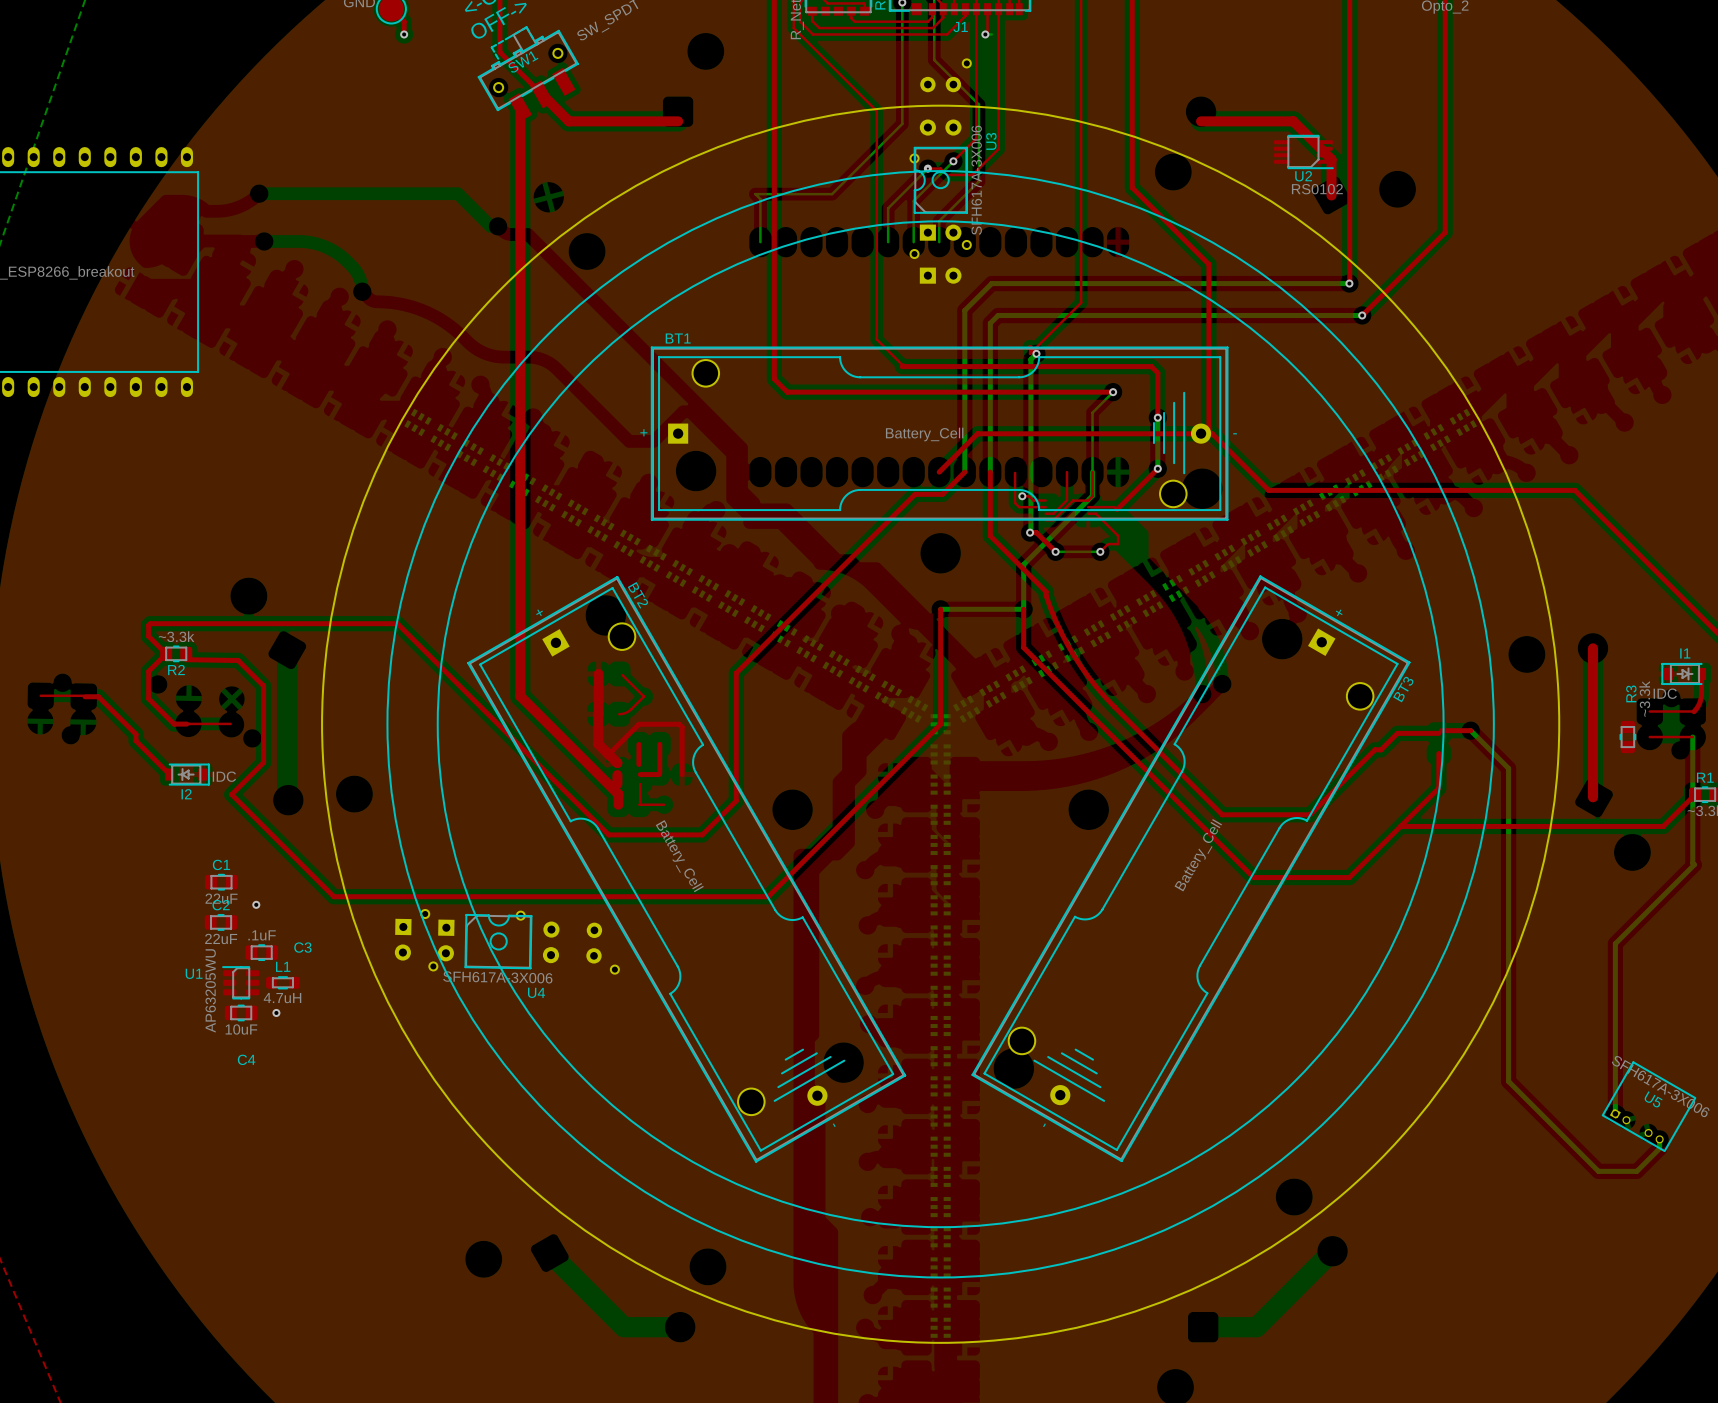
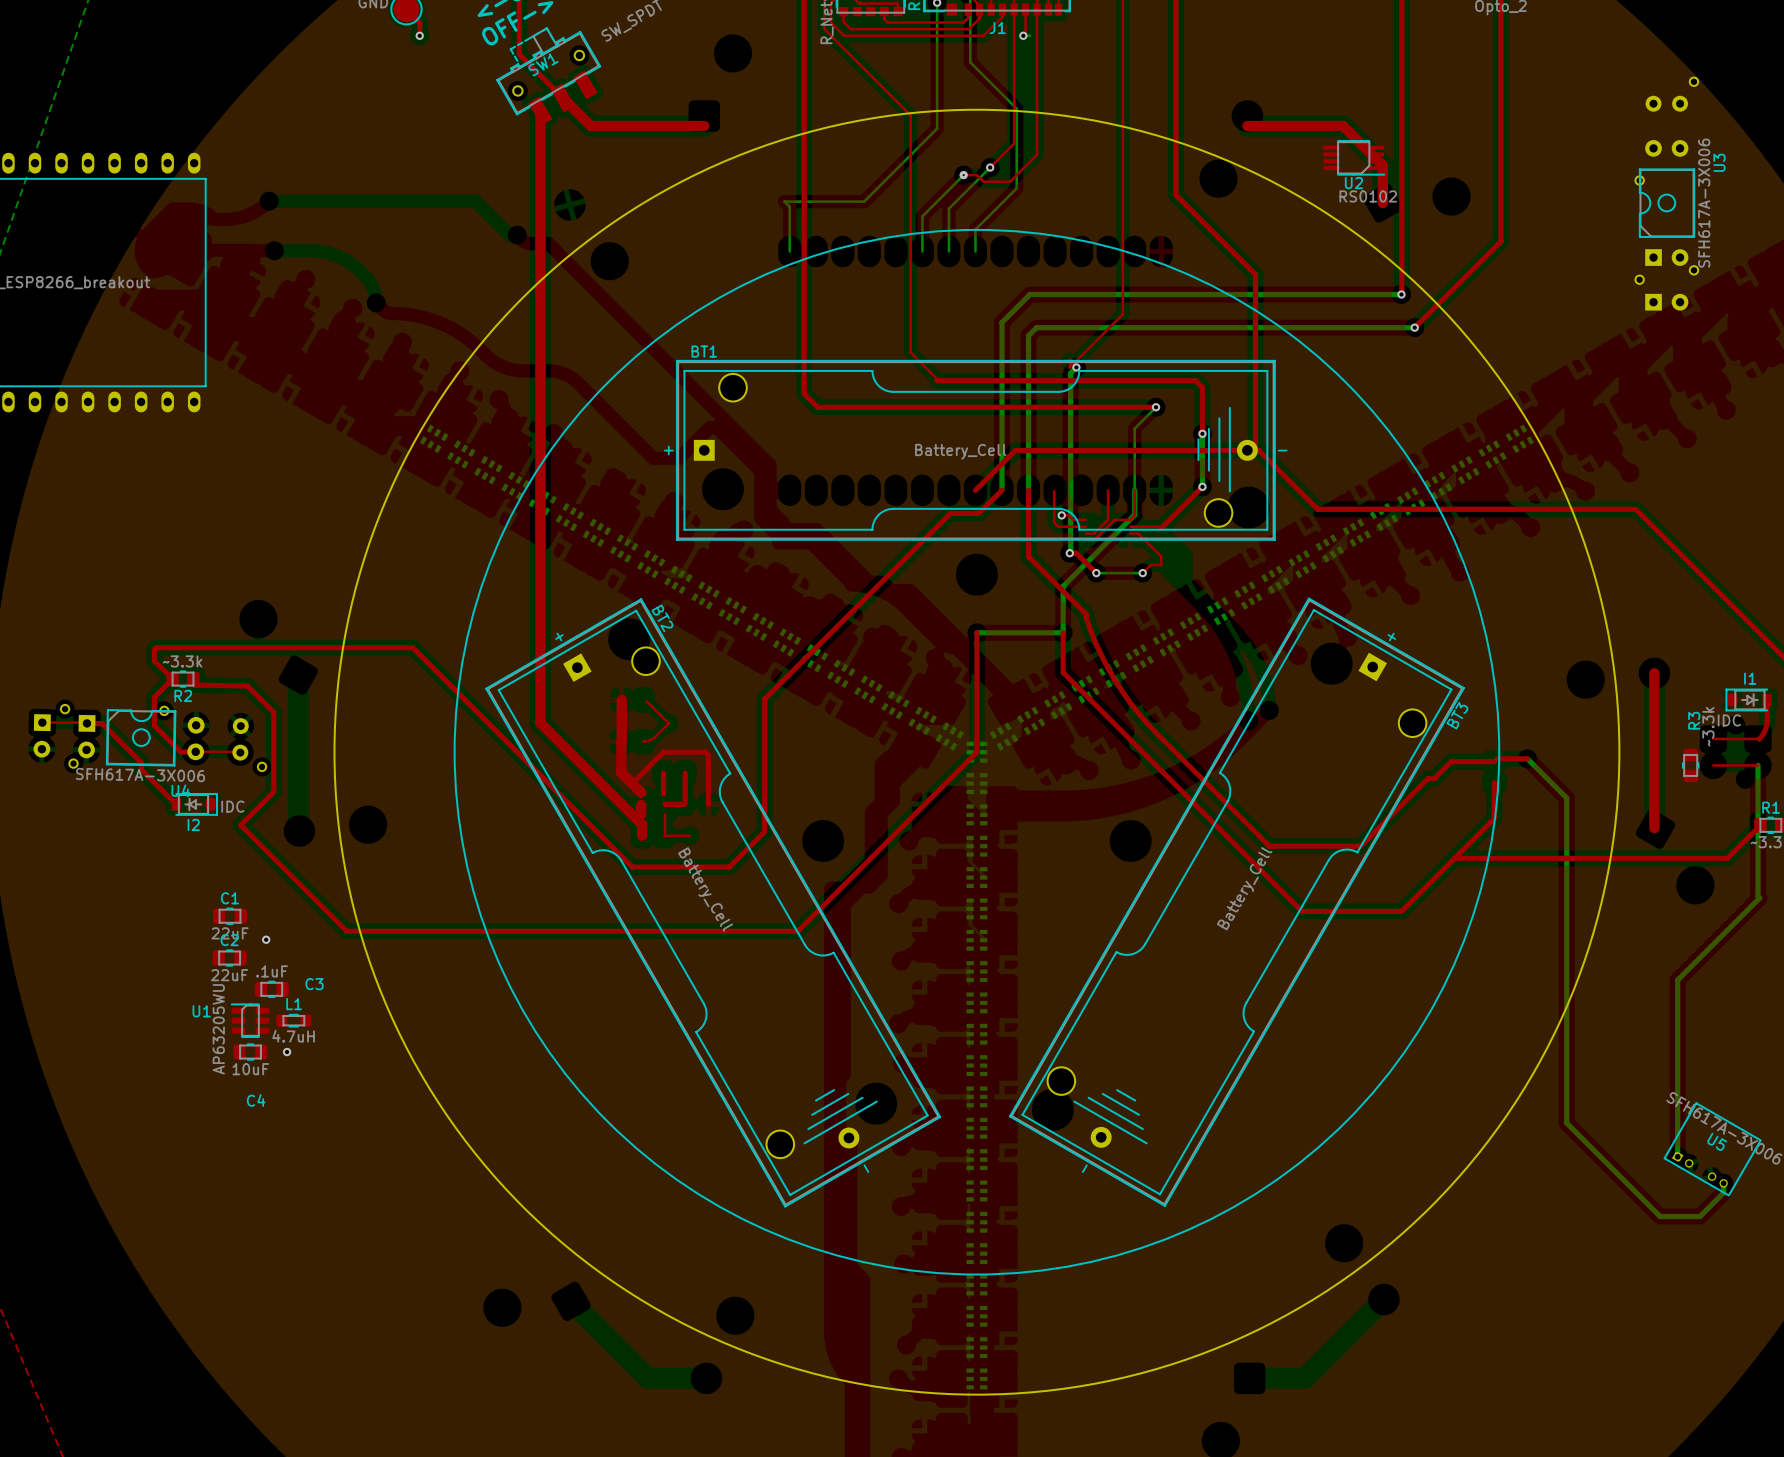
drawing: [386, 170, 1495, 1279] -> none
U3 position: (940, 171) -> (1666, 194)
U4 position: (506, 941) -> (149, 738)

